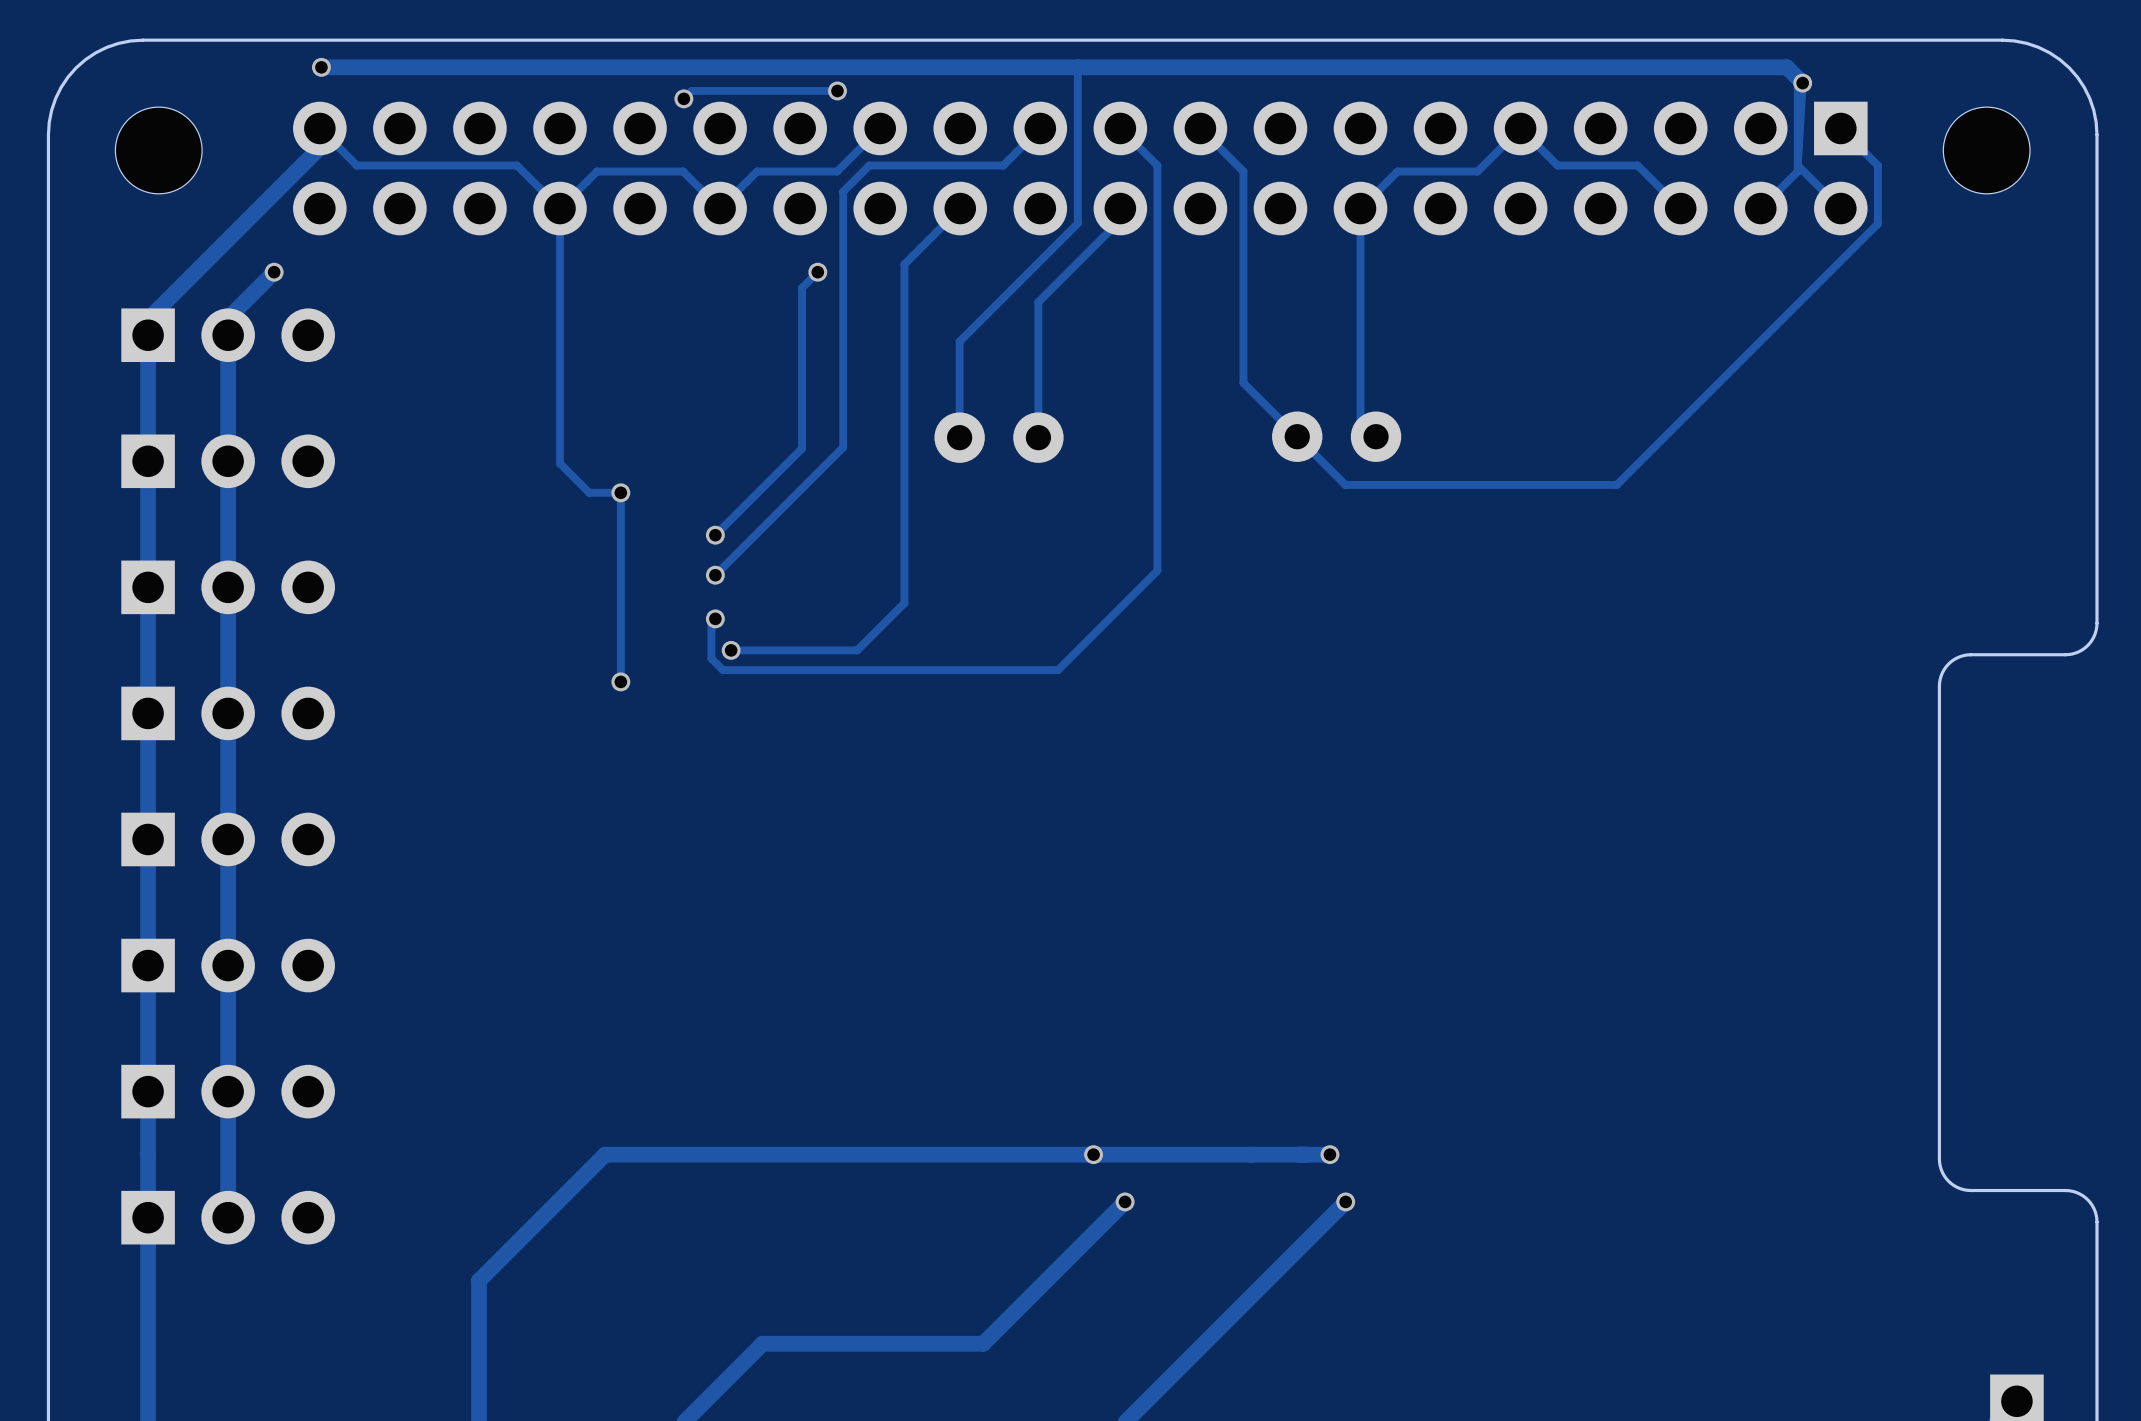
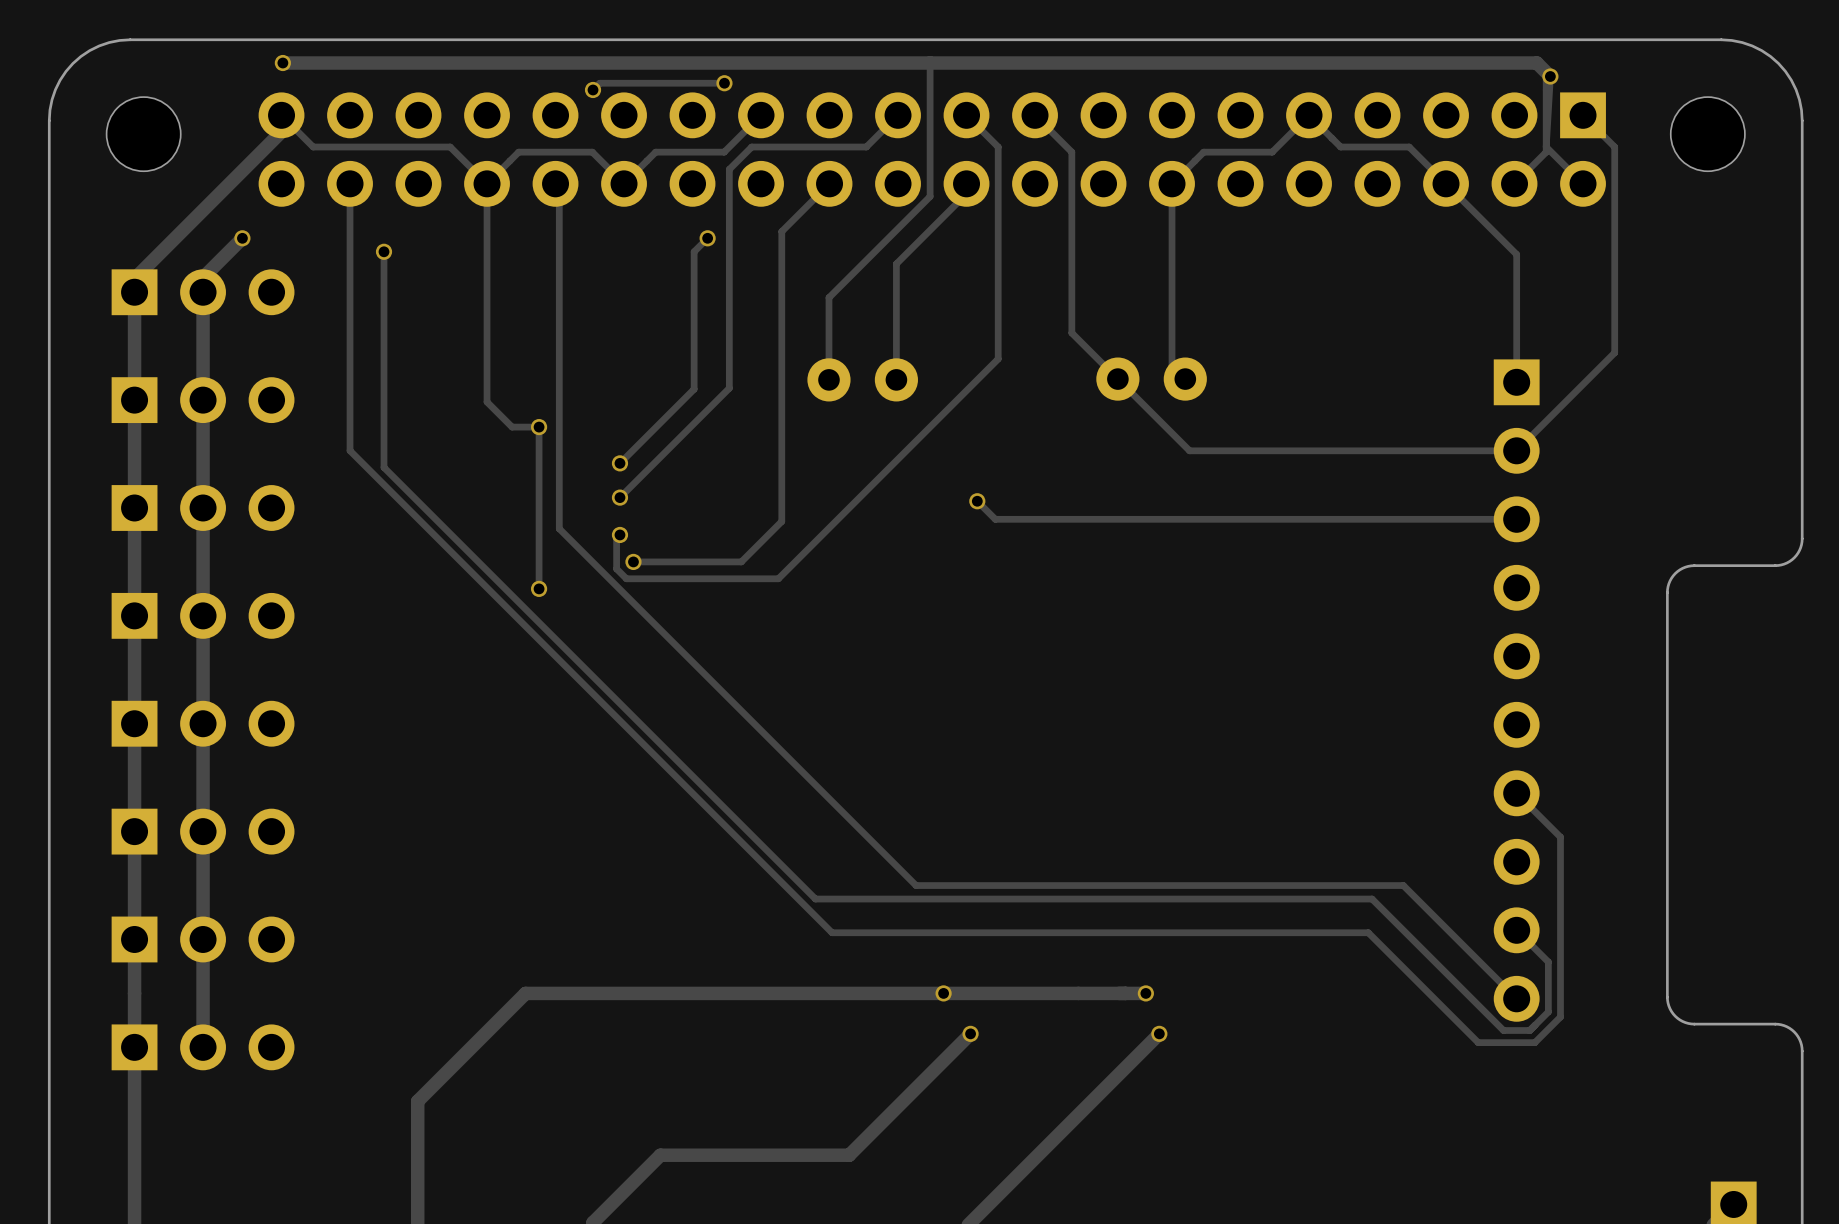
track: none -> (350, 183) (350, 450) (832, 932) (1368, 932) (1478, 1042) (1534, 1042) (1560, 1017) (1560, 837) (1516, 793)
track: none -> (555, 183) (559, 187) (559, 528) (916, 885) (1403, 885) (1516, 998)
track: none -> (1446, 183) (1516, 254) (1516, 382)
track: (1877, 223) (1616, 484) (1345, 484) -> (1614, 196) (1614, 352) (1516, 450) (1189, 450) (1159, 420)
track: none -> (384, 251) (384, 467) (815, 899) (1372, 899) (1503, 1030) (1529, 1030) (1548, 1011) (1548, 962) (1516, 930)
via: none -> (384, 251)
track: (1157, 413) (1157, 570) (1058, 670) (900, 670) -> (998, 358) (778, 578)
track: none -> (977, 501) (995, 519) (1516, 519)
via: none -> (977, 501)
part: none -> (1516, 690)

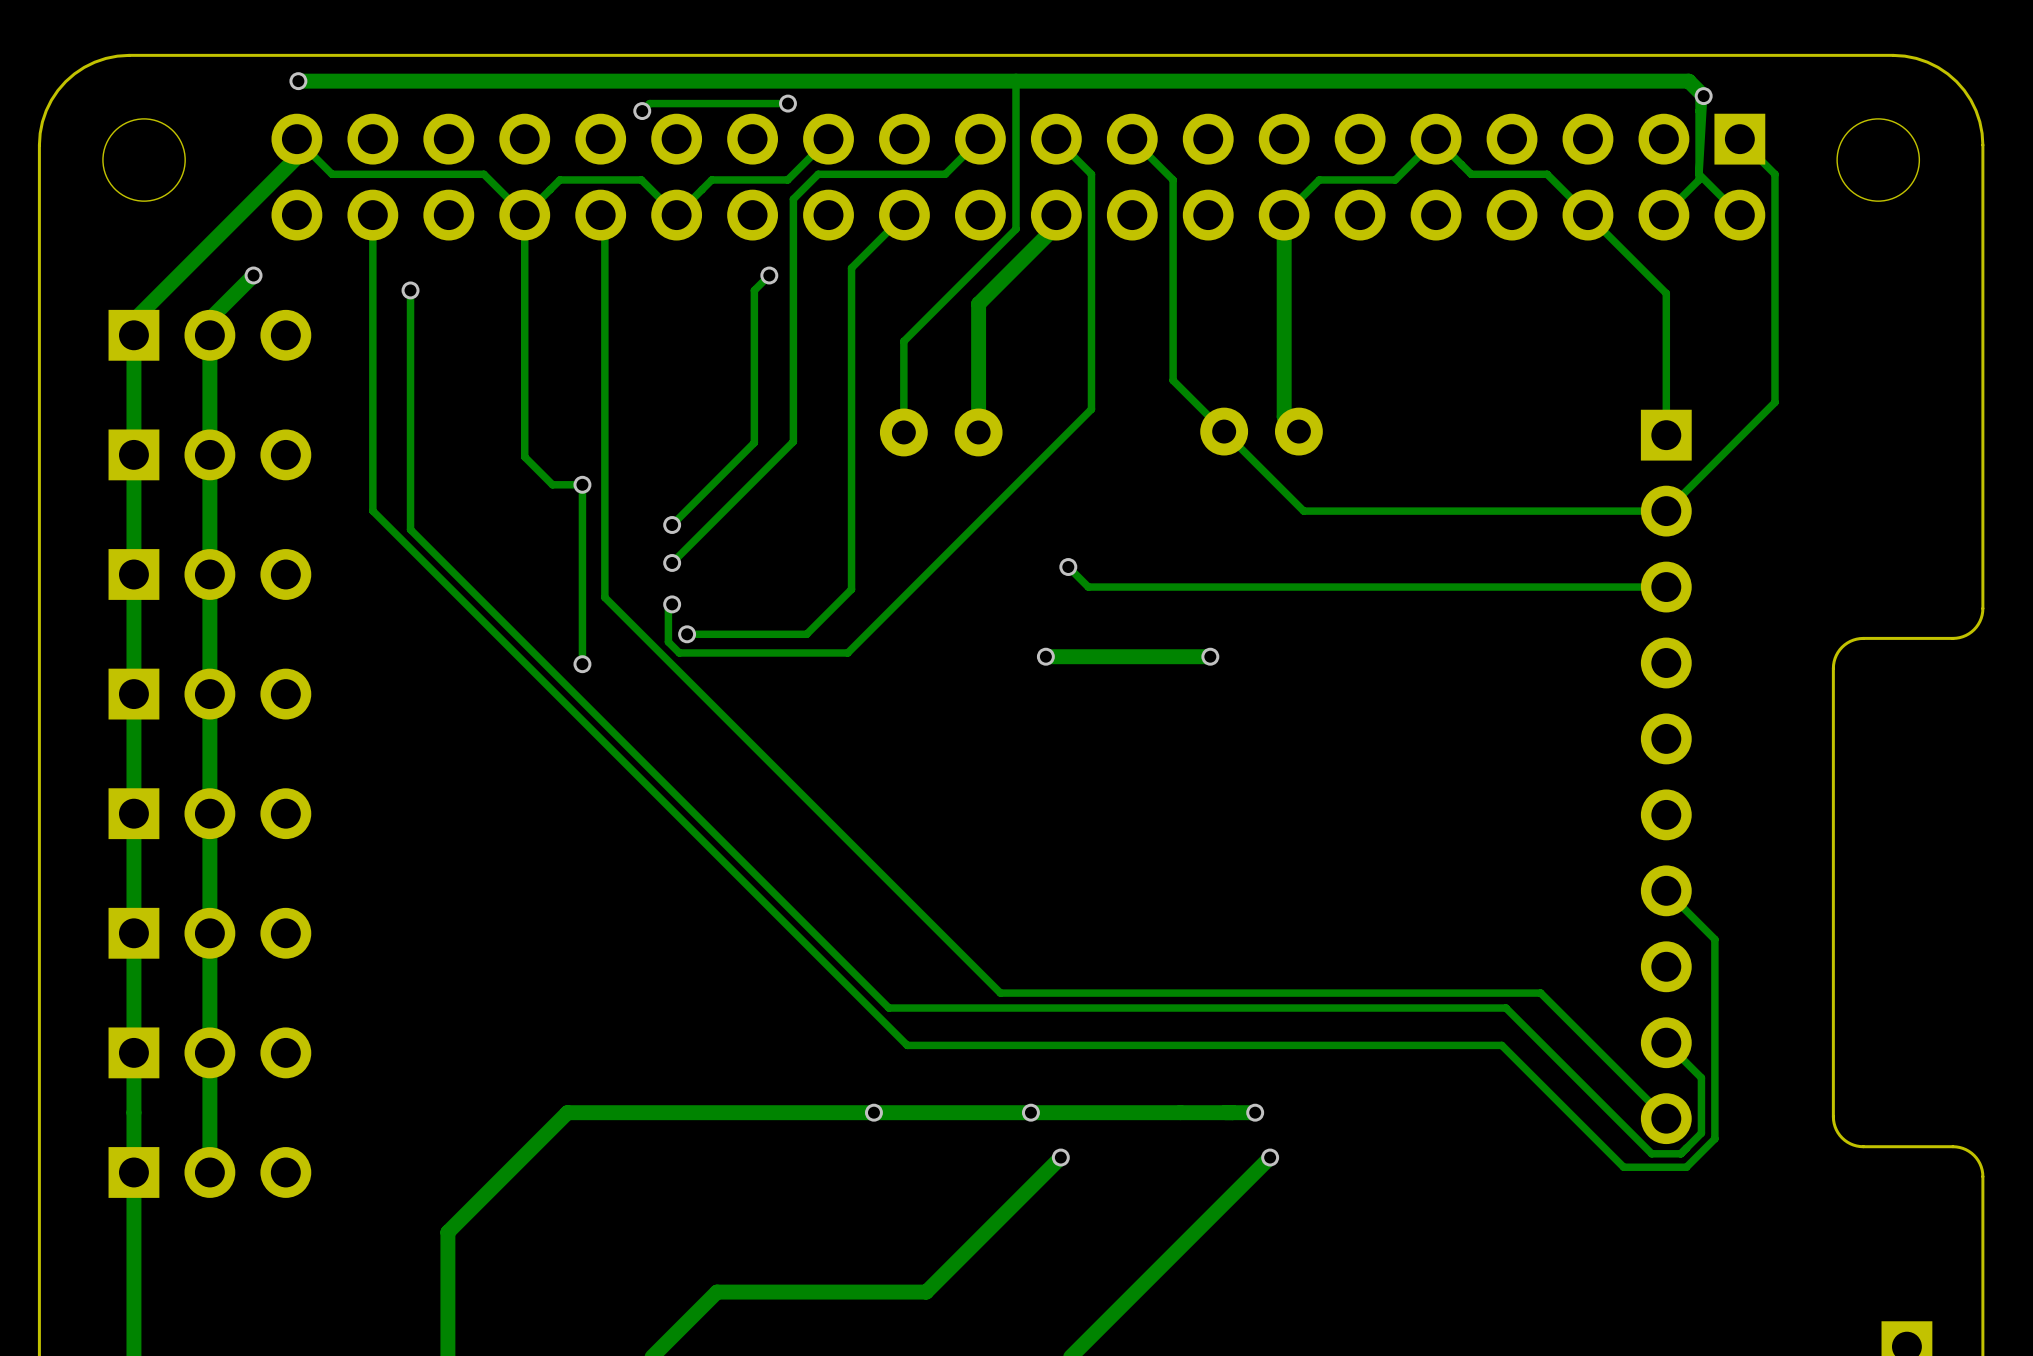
track width: thin (1172, 183) (1172, 365) (1185, 379) -> thick (1284, 215) (1284, 416) (1298, 431)
track width: thin (966, 193) (896, 263) (896, 379) -> thick (1056, 226) (978, 303) (978, 432)
via: none -> (1045, 656)
track: none -> (1210, 656) (1045, 656)
via: none -> (1210, 656)
via: none -> (873, 1112)

